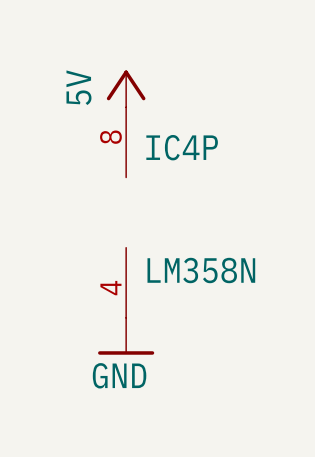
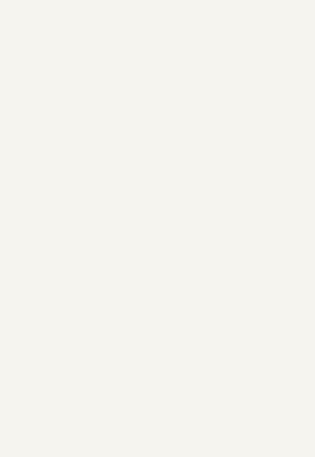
power symbol: 5V (126, 88) -> none
IC4P: LM358N (126, 212) -> none
power symbol: GND (126, 336) -> none

